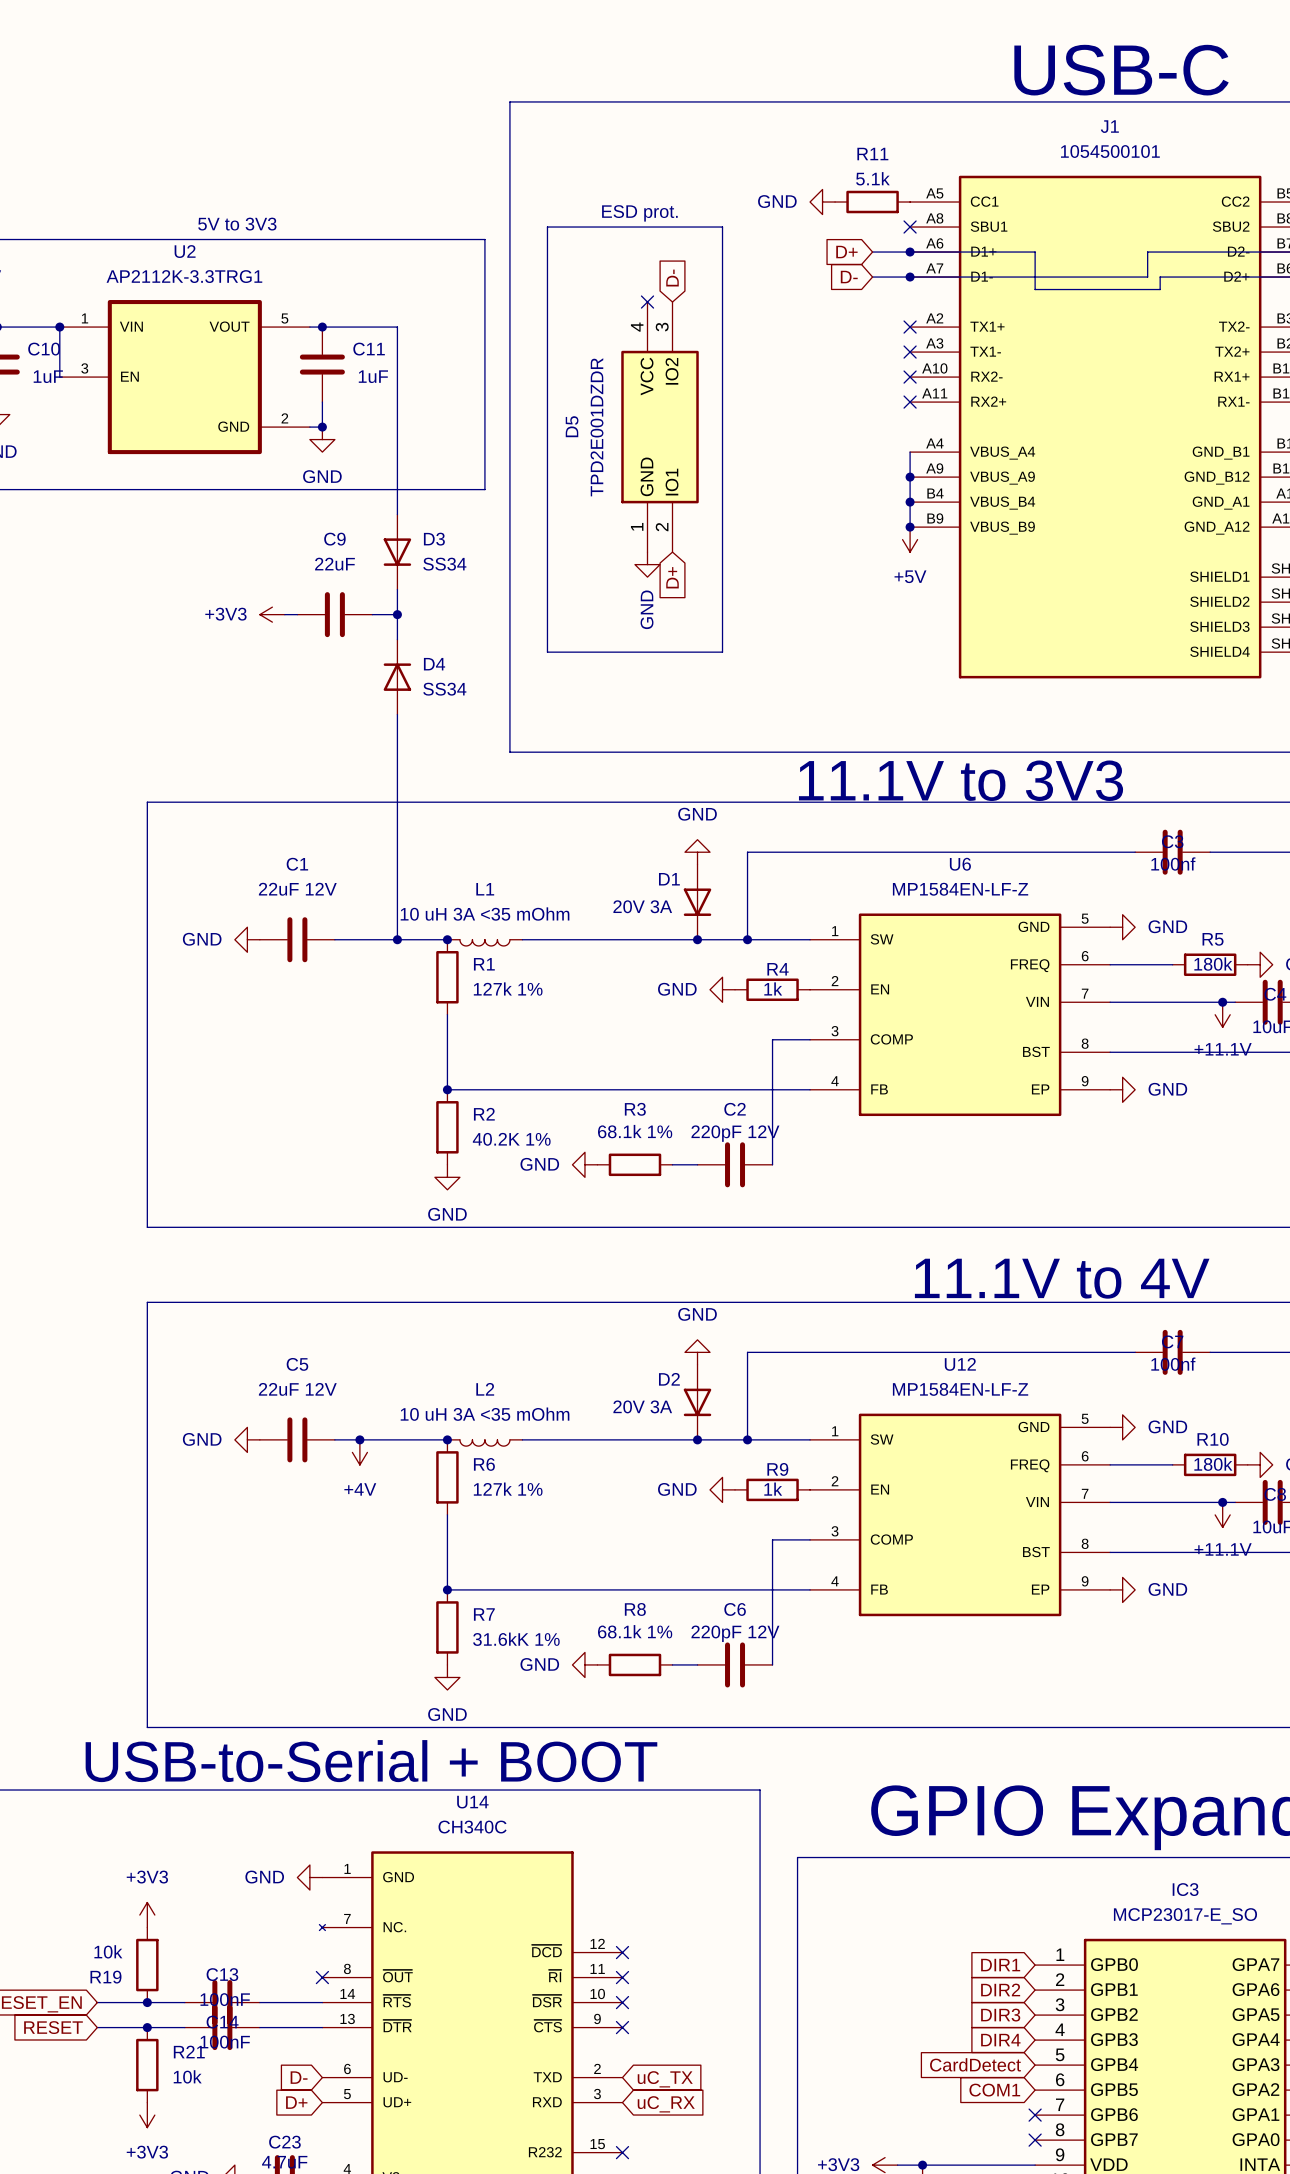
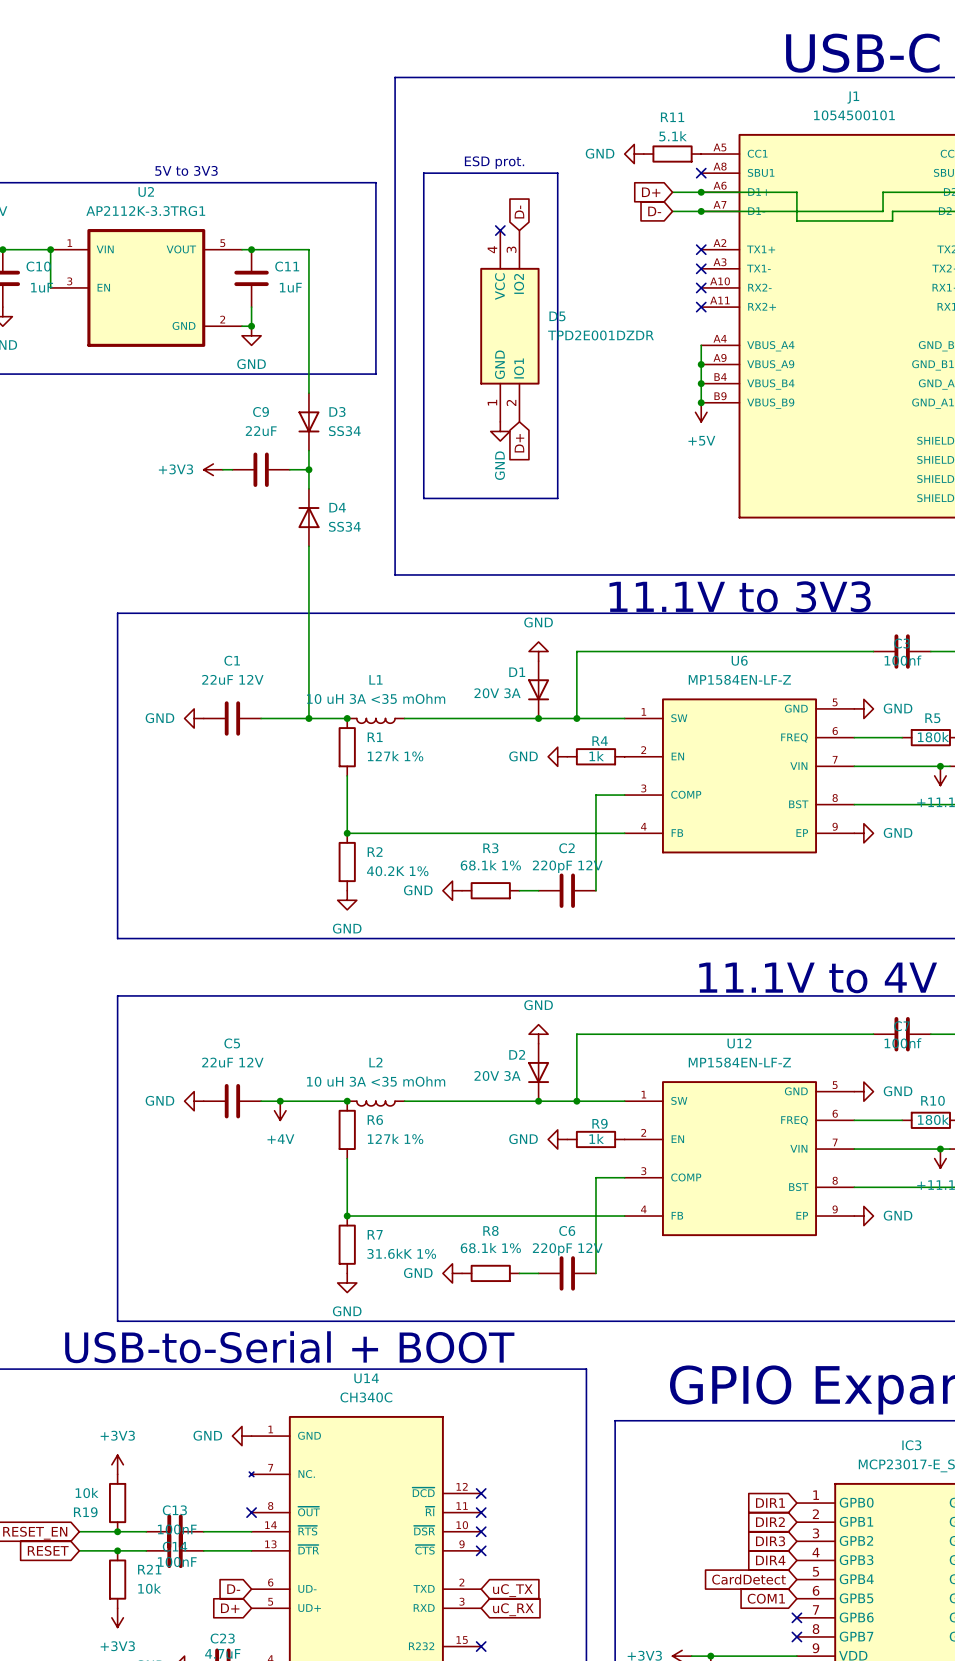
D5 name rotation: 0° (572, 426) -> 90° clockwise (557, 316)
D5 name position: D5 (572, 426) -> D5 (557, 316)
D5 value rotation: 0° (597, 427) -> 90° clockwise (600, 335)
D5 value position: TPD2E001DZDR (597, 427) -> TPD2E001DZDR (600, 335)

